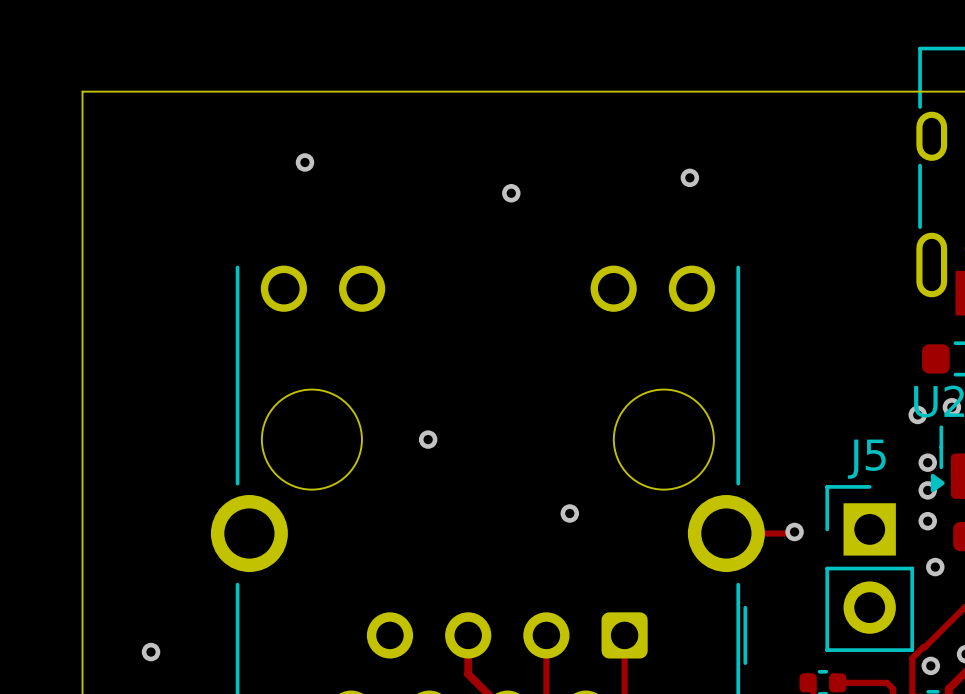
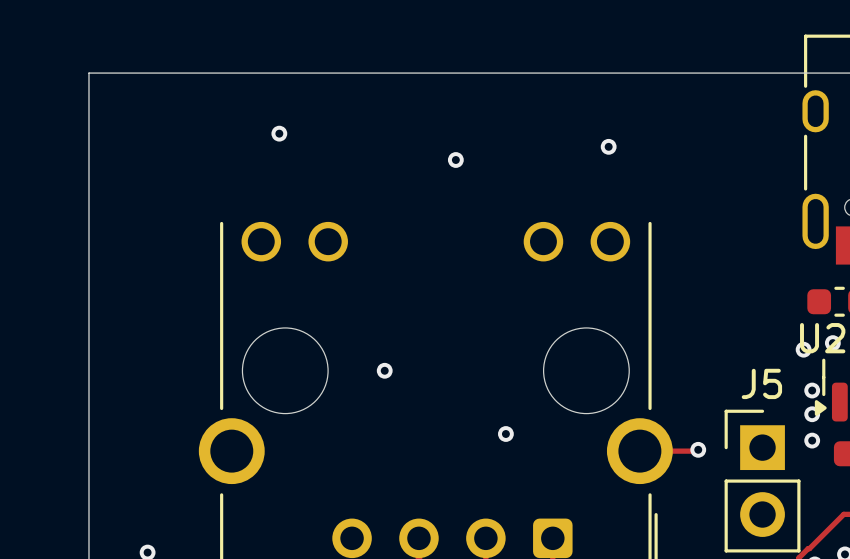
via: (935, 567) -> none

